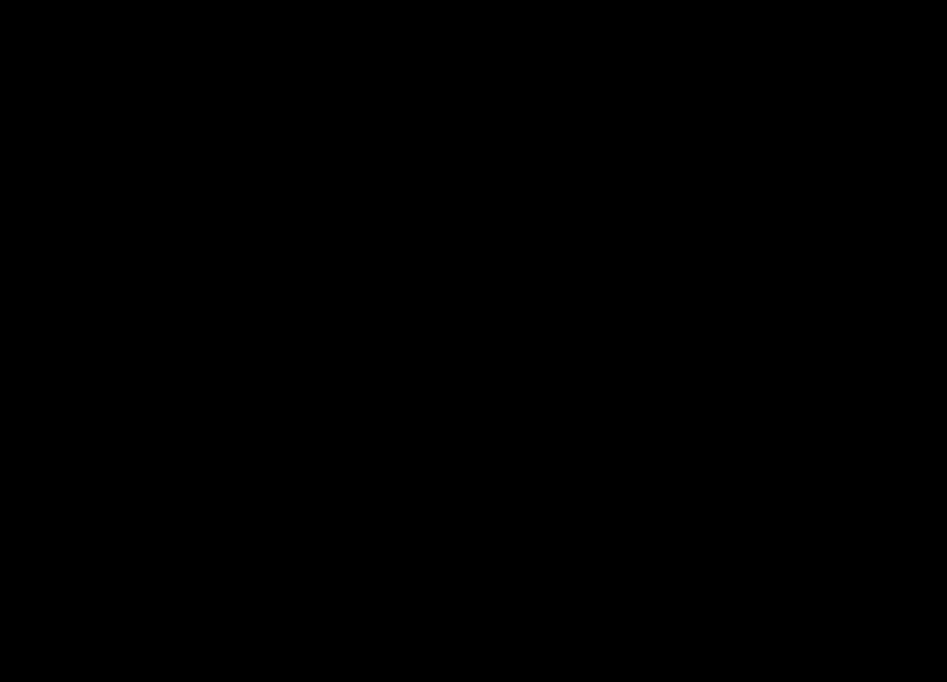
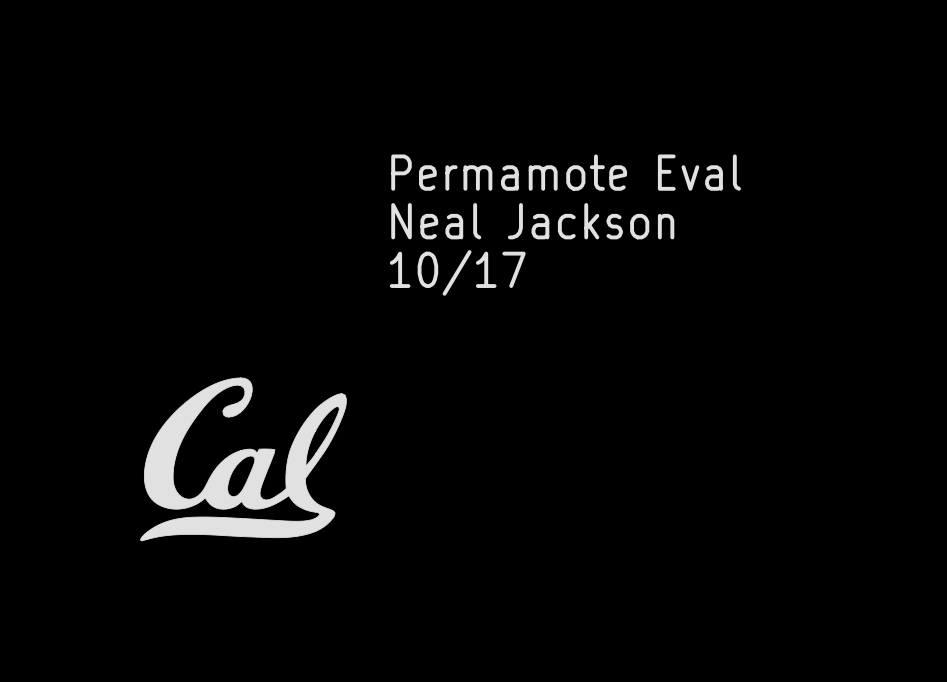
text: none -> Permamote Eval (566, 172)
text: none -> Neal Jackson (532, 221)
text: none -> 10/17 (457, 272)
drawing: none -> [140, 377, 347, 542]

